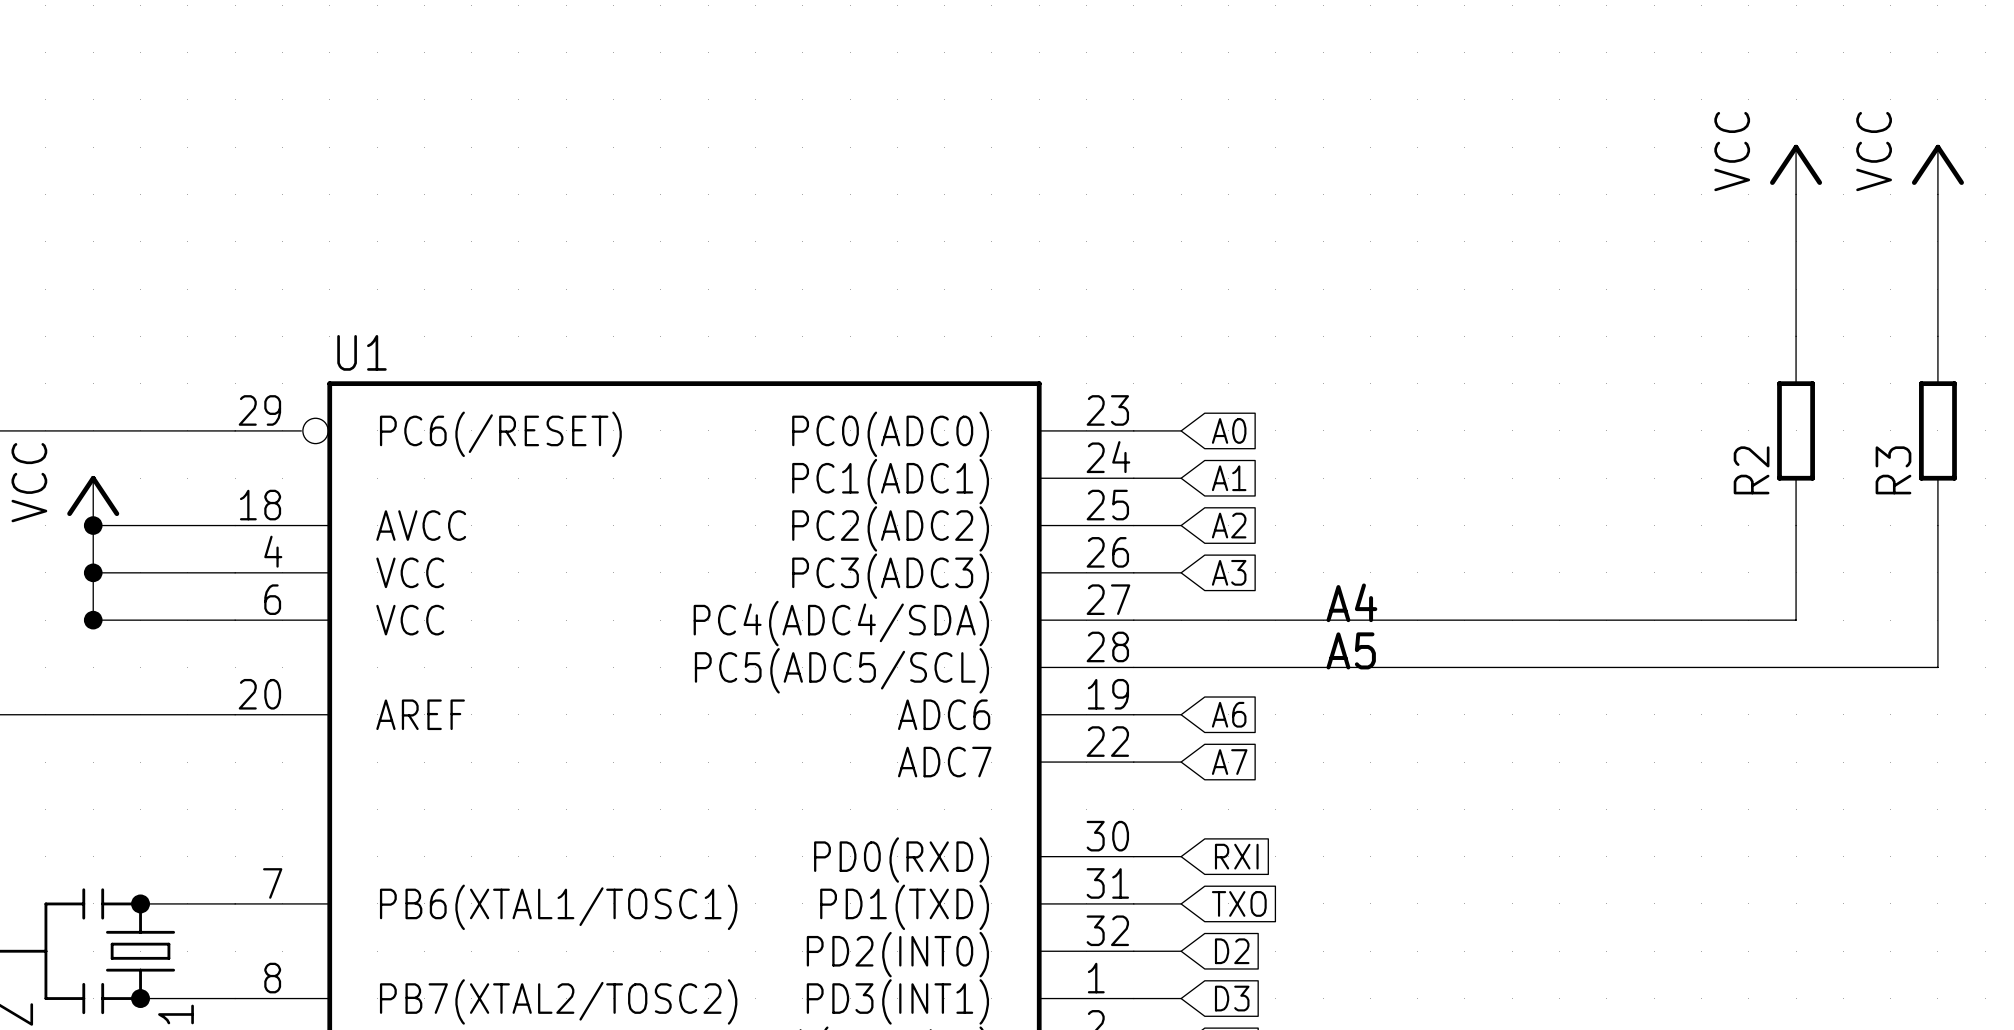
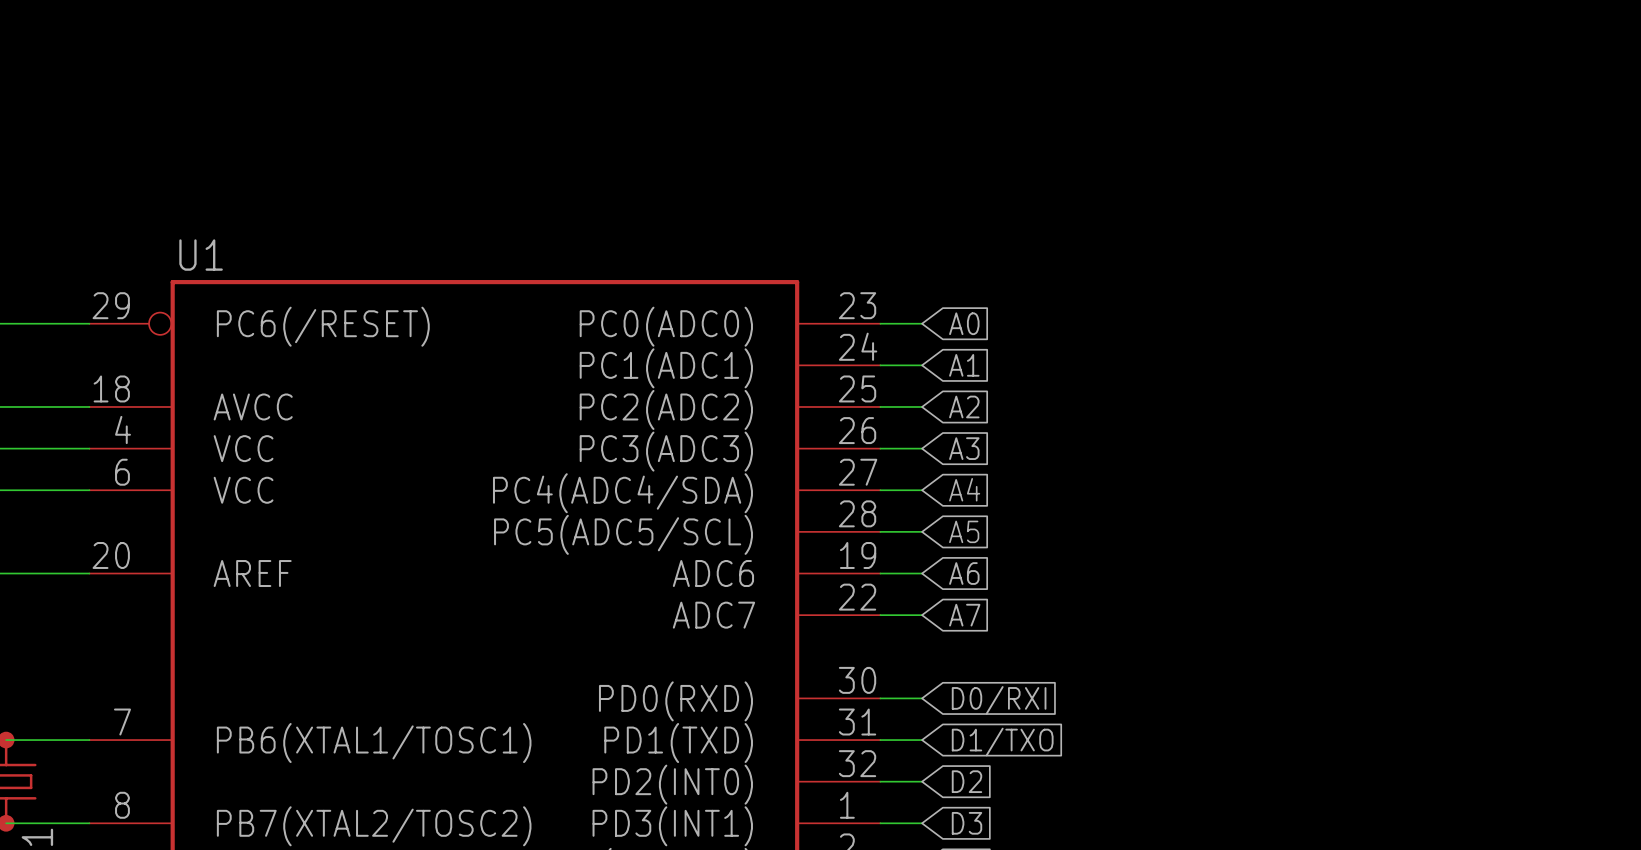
power symbol: VCC (1796, 169) -> none
power symbol: VCC (1937, 169) -> none
wire: (1796, 194) (1796, 336) -> none
wire: (1937, 194) (1937, 336) -> none
R2: (1796, 430) -> none
R3: (1937, 430) -> none
wire: (1796, 525) (1796, 620) (1181, 620) -> none
wire: (1937, 525) (1937, 667) (1181, 667) -> none
label: A4 (1351, 602) -> none
global label: none -> A4 (964, 489)
label: A5 (1351, 650) -> none
global label: none -> A5 (964, 531)
global label: RXI (1236, 856) -> D0/RXI (999, 700)
global label: TXO (1239, 903) -> D1/TXO (1002, 742)

